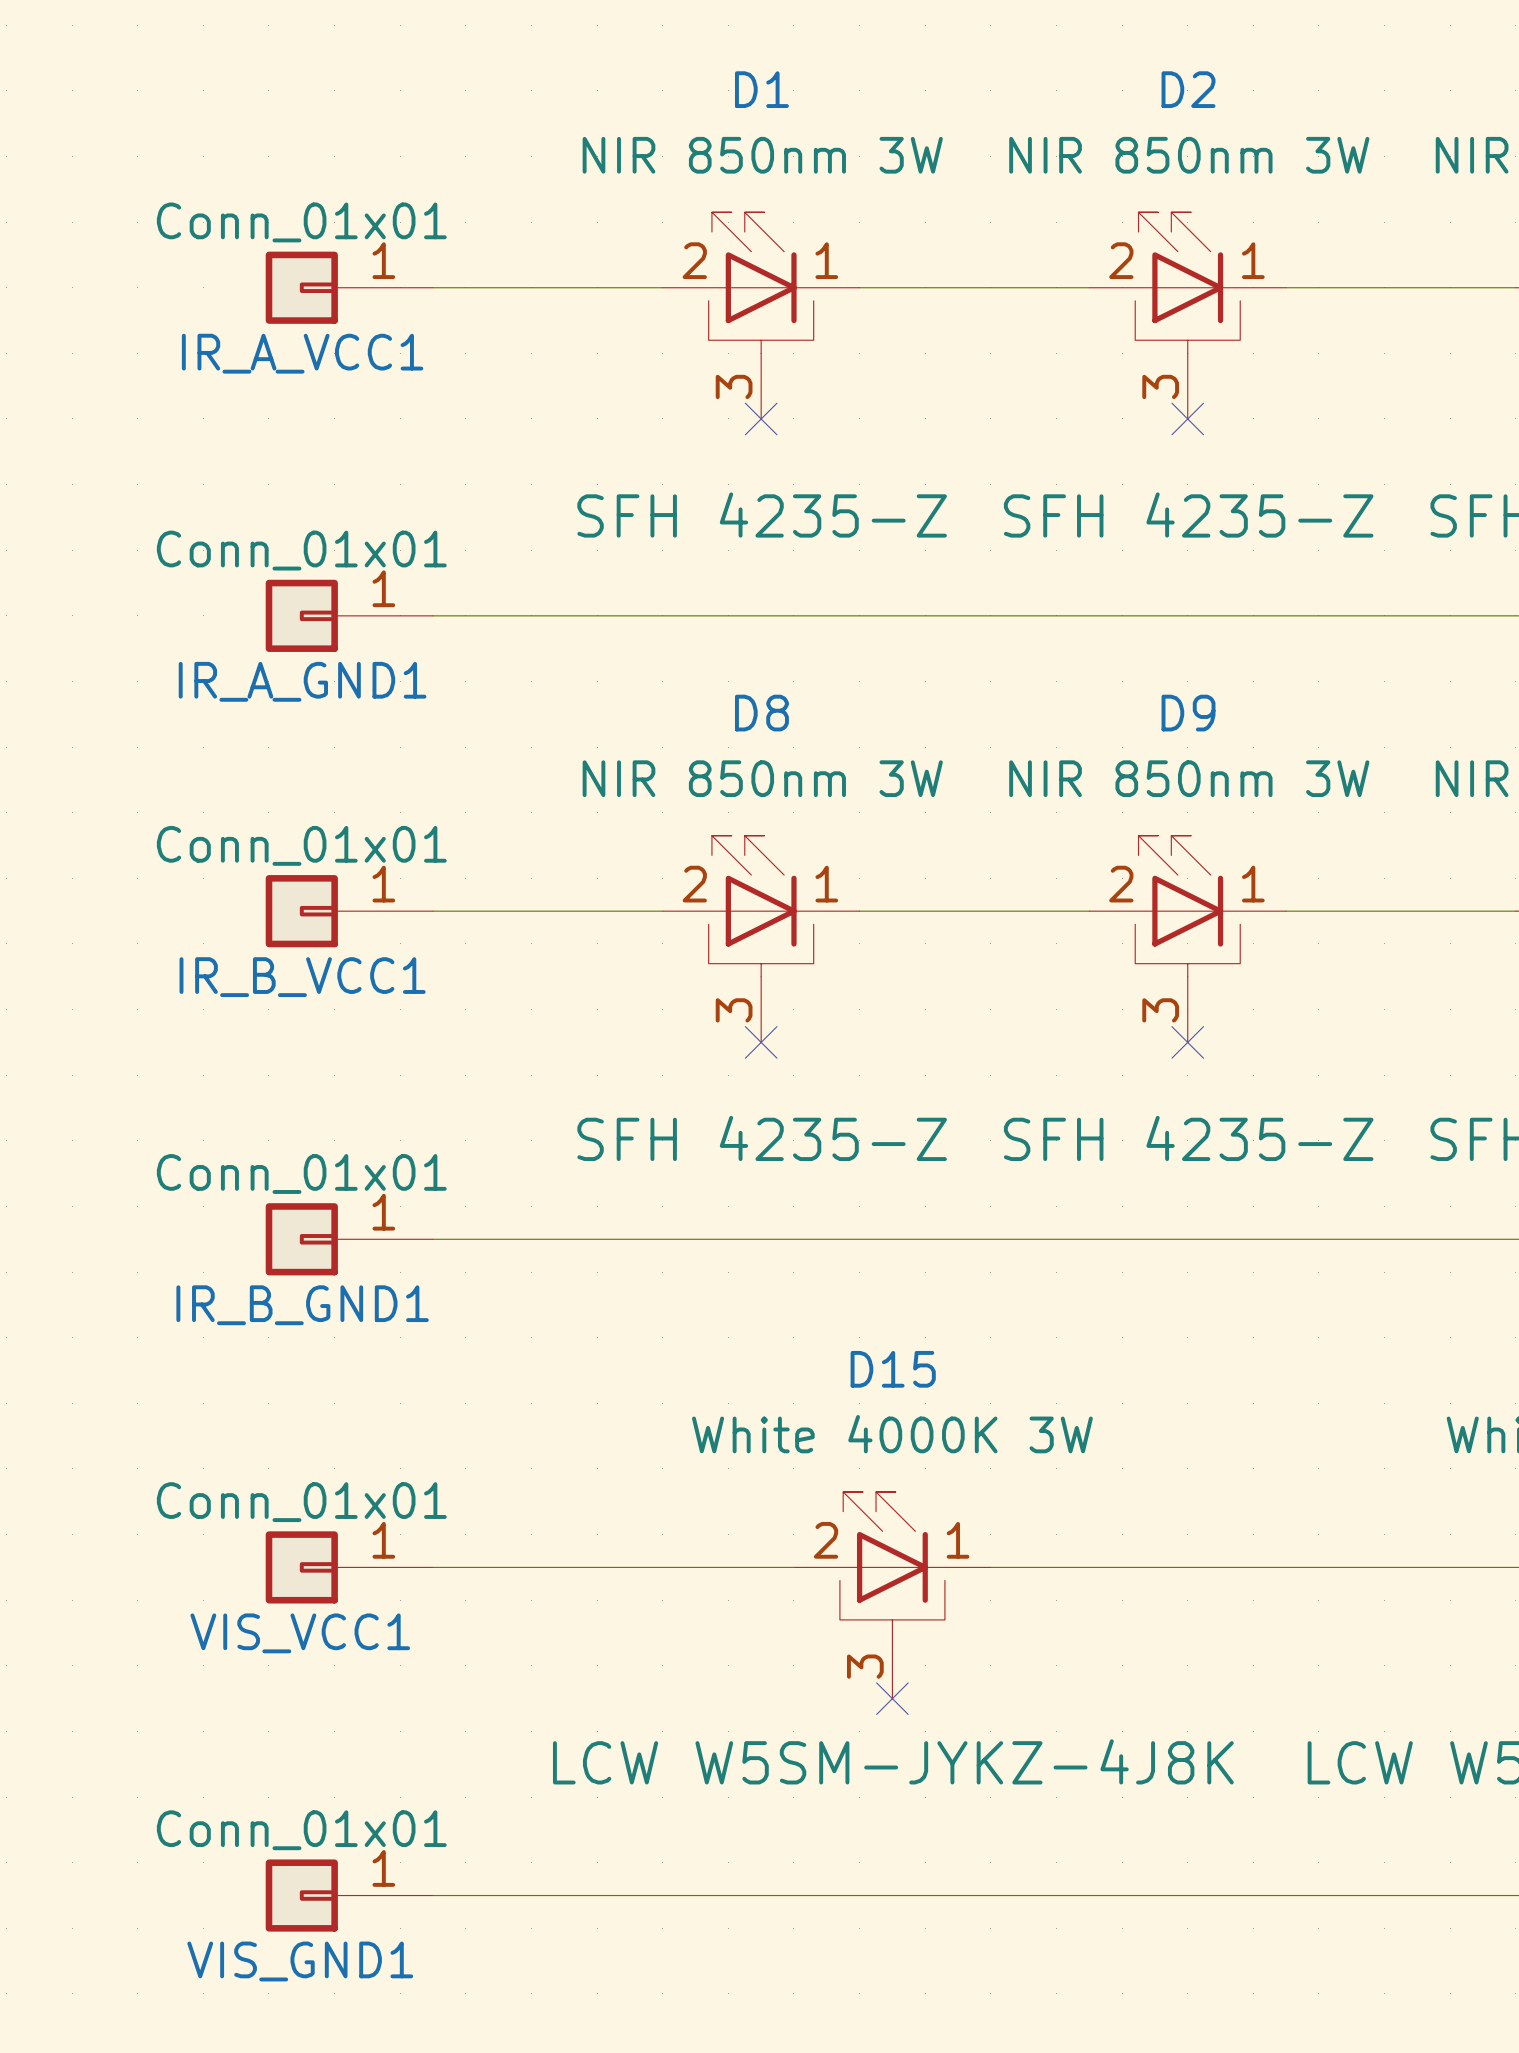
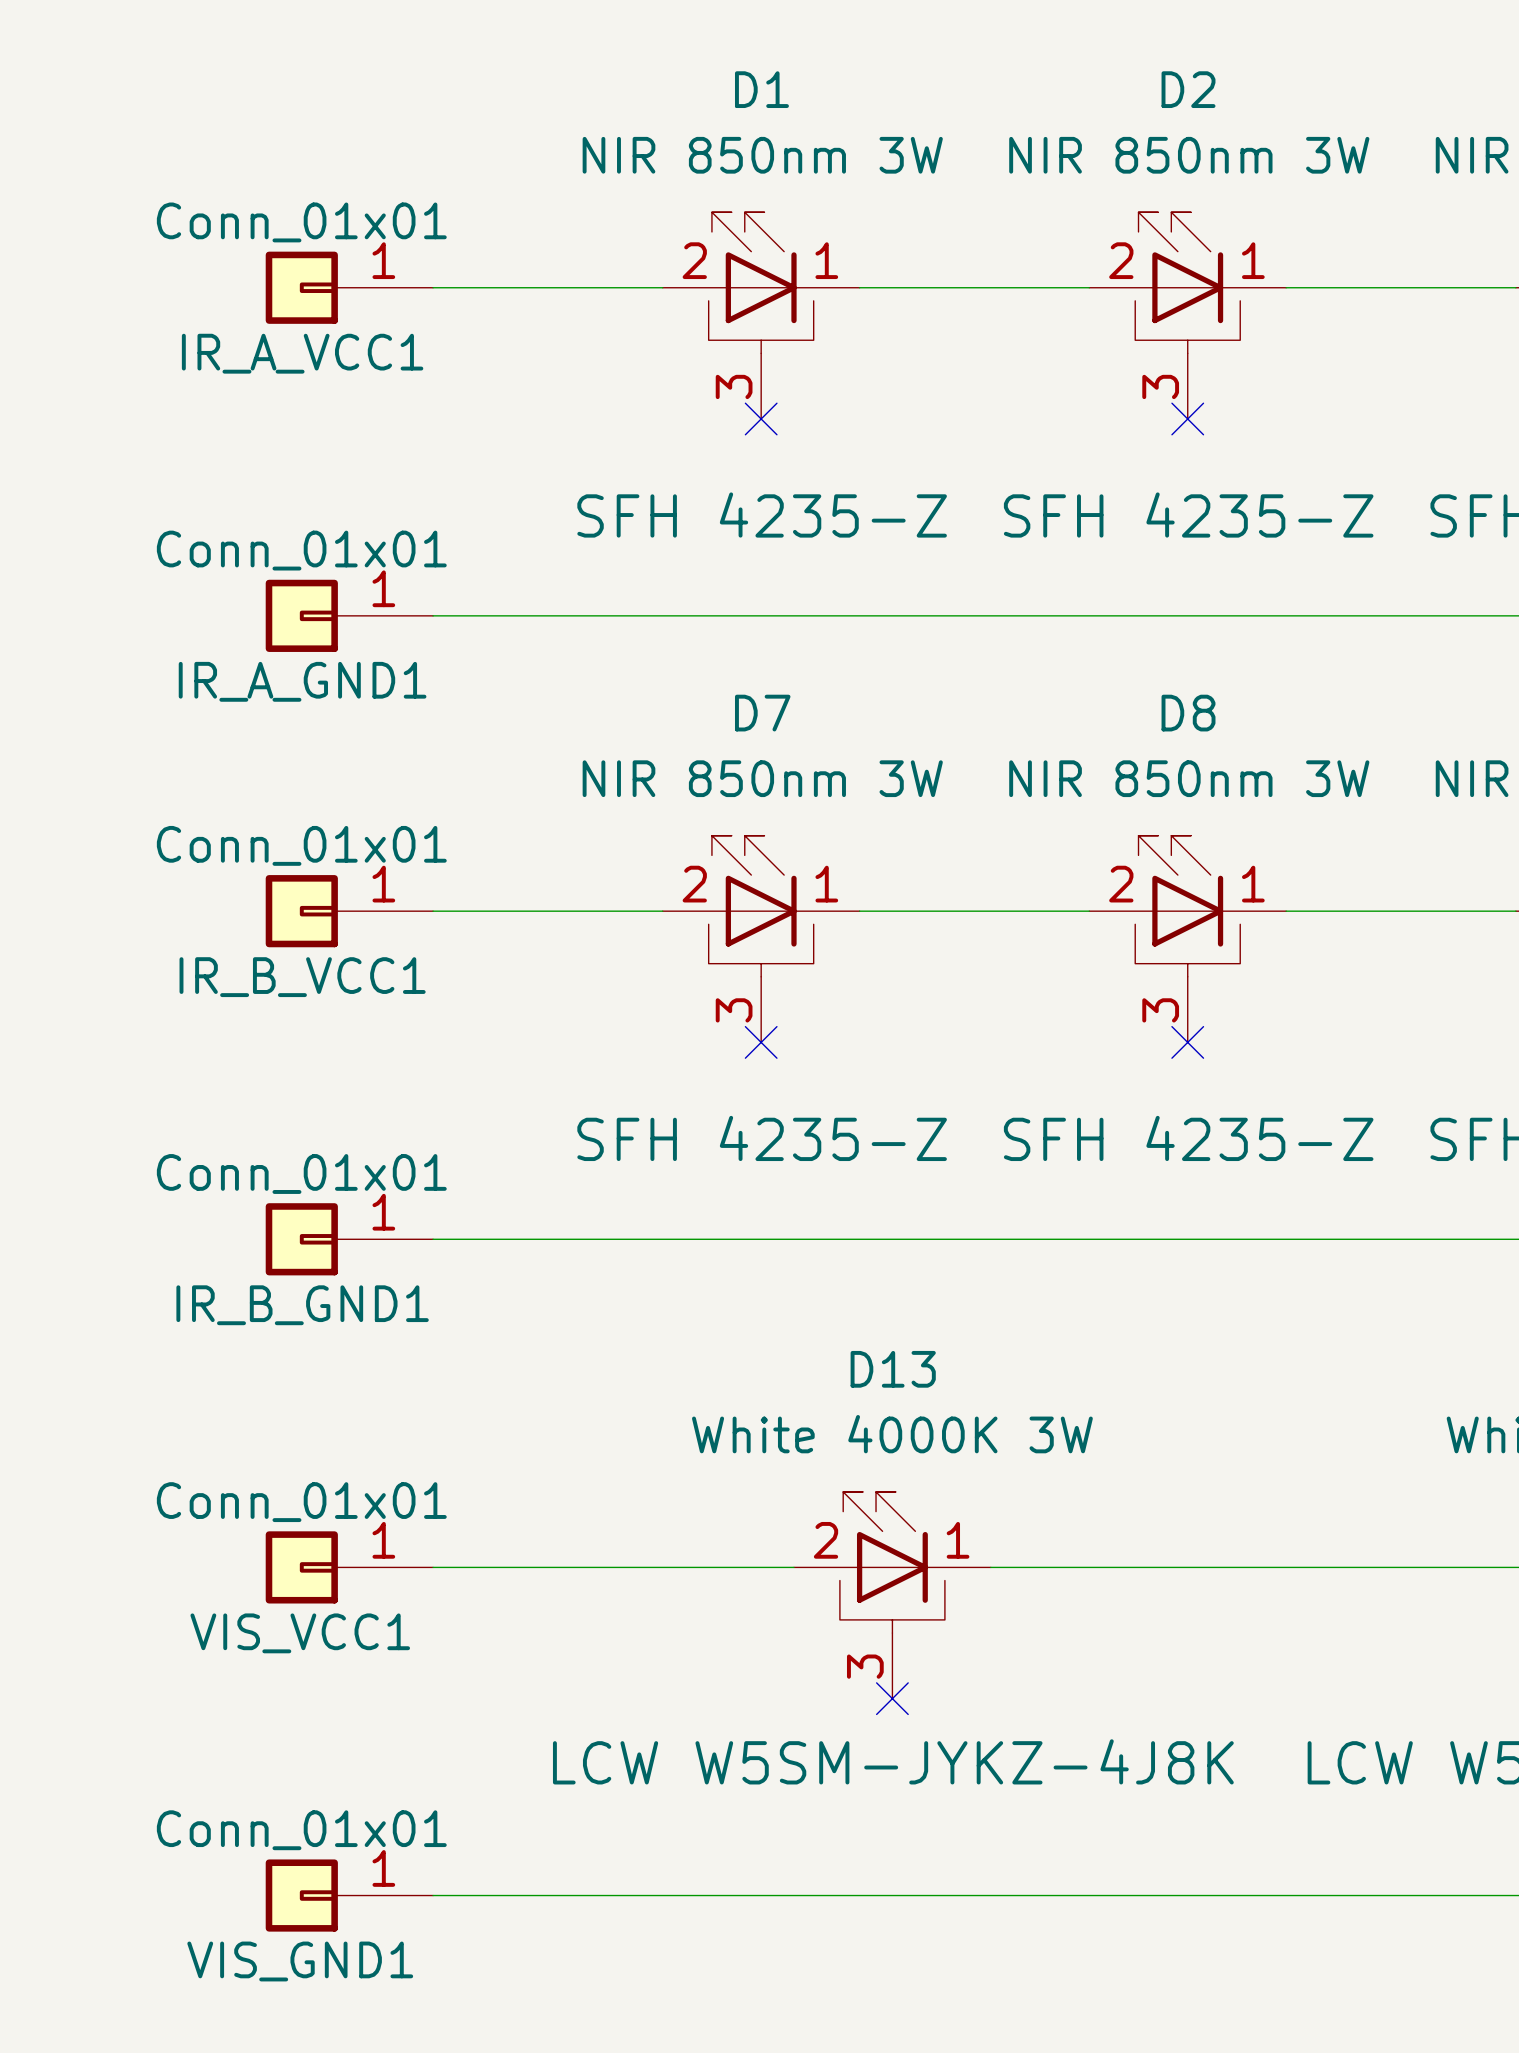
D8 name: D8 (761, 713) -> D7 (762, 713)
D9 name: D9 (1188, 713) -> D8 (1188, 713)
D15 name: D15 (893, 1369) -> D13 (893, 1369)

